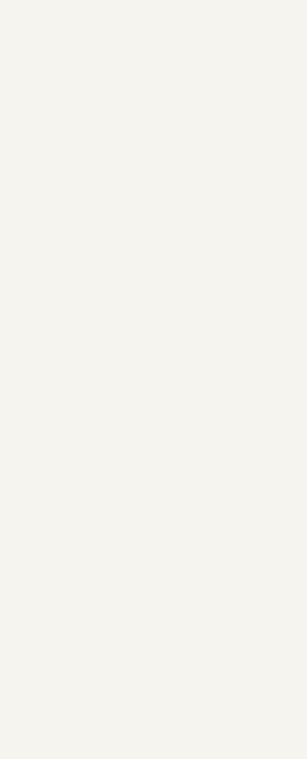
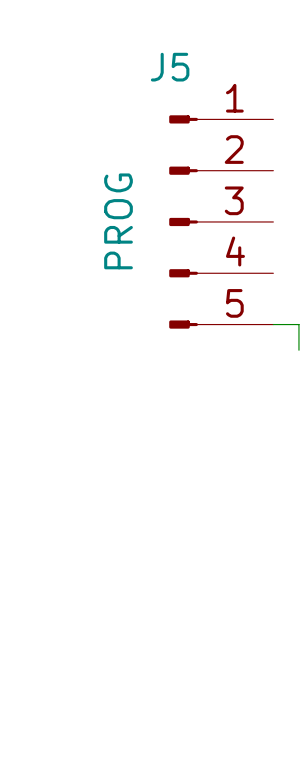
J5: none -> PROG (221, 221)
wire: none -> (273, 324) (298, 324) (298, 350)

